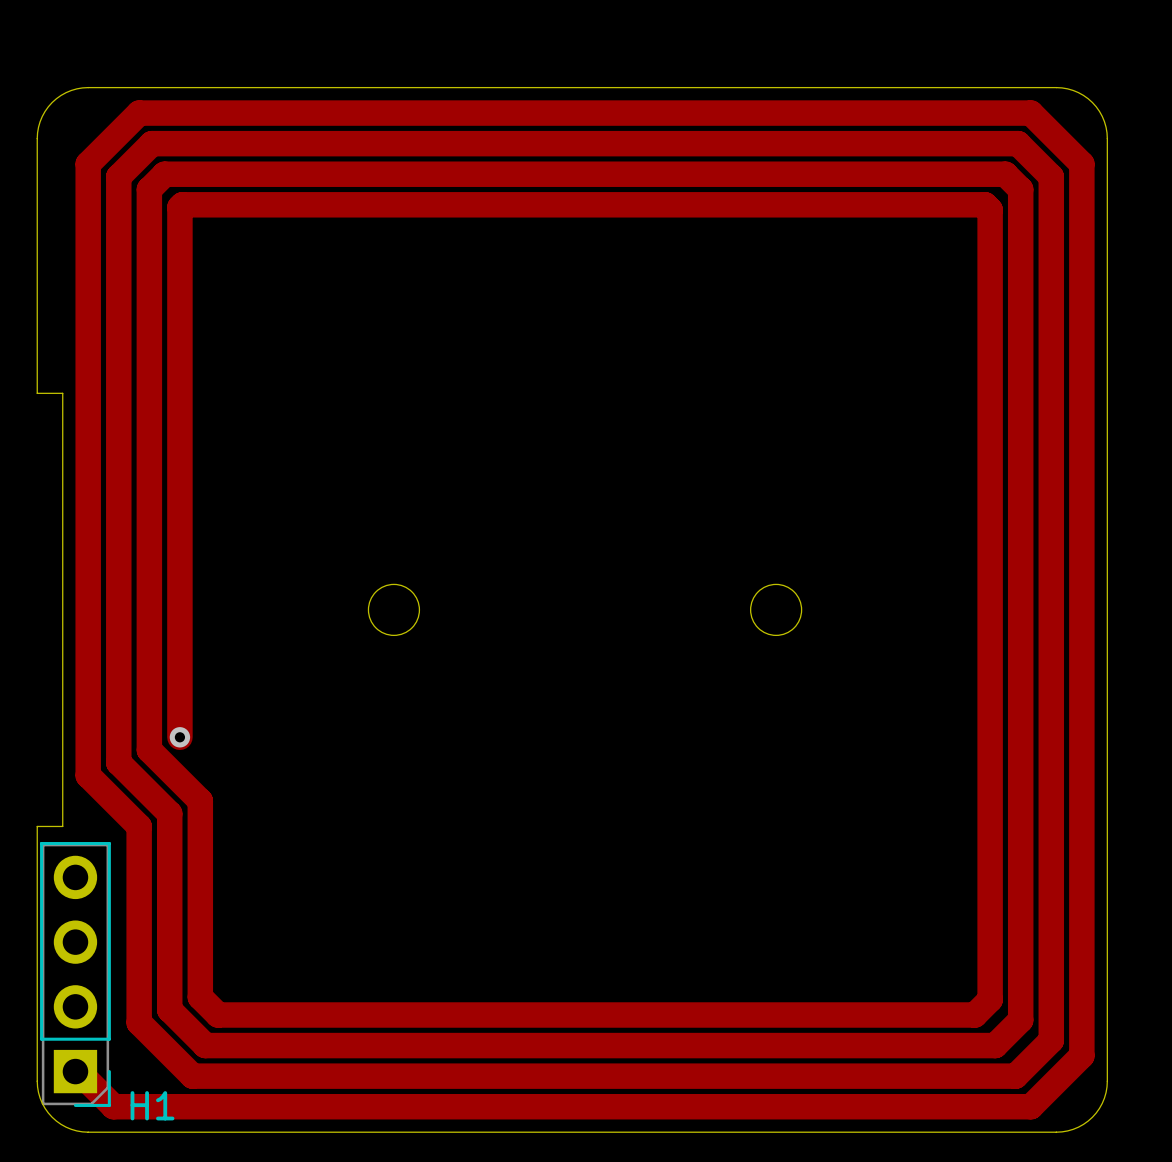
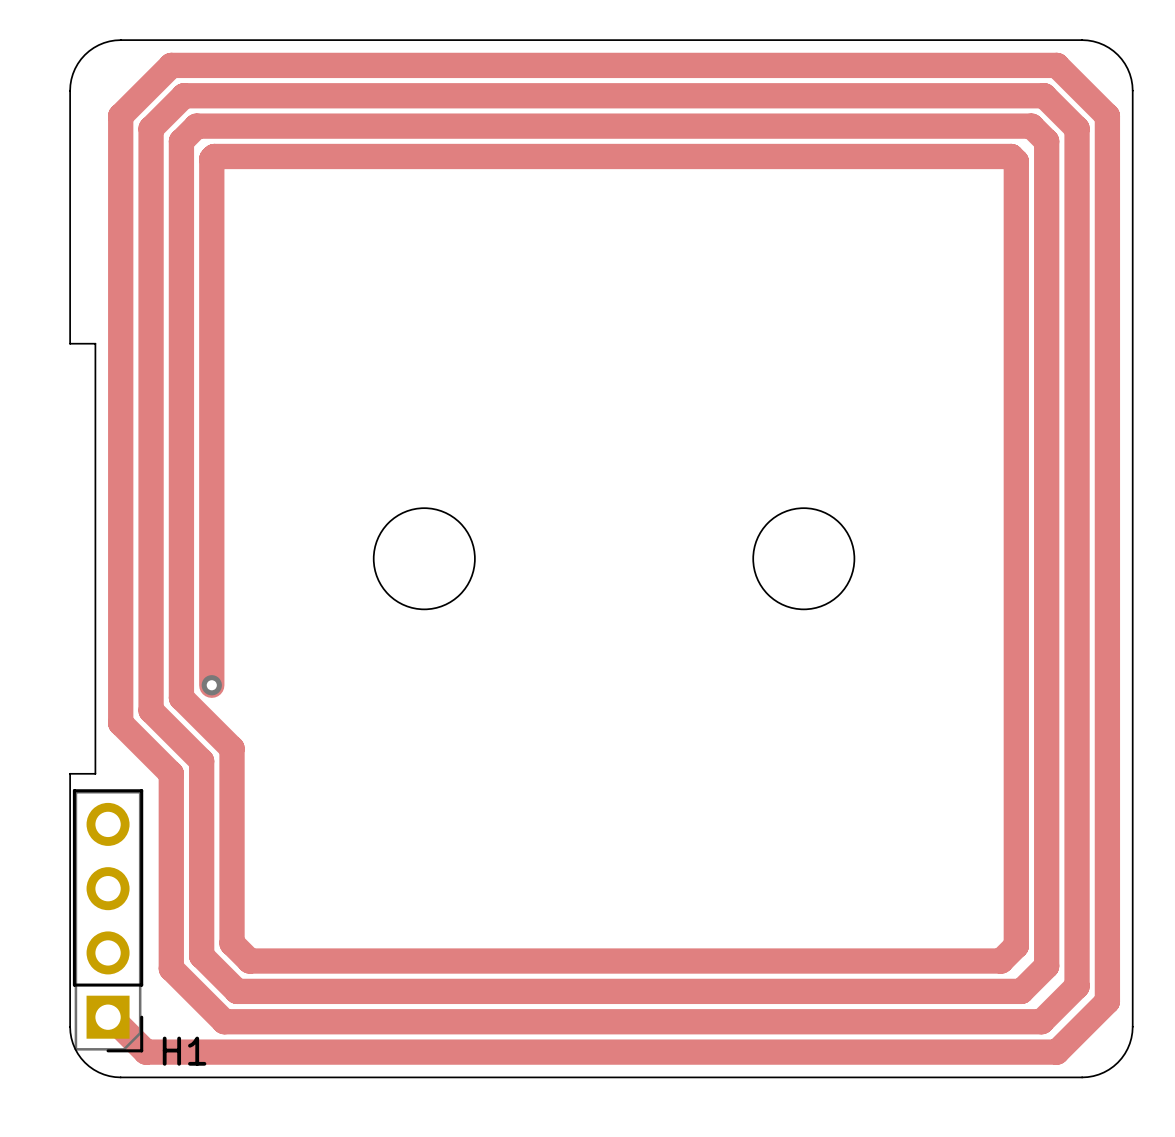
round board edge size: [367, 583, 421, 637] -> [373, 507, 476, 610]
round board edge size: [750, 583, 803, 637] -> [752, 507, 856, 610]

